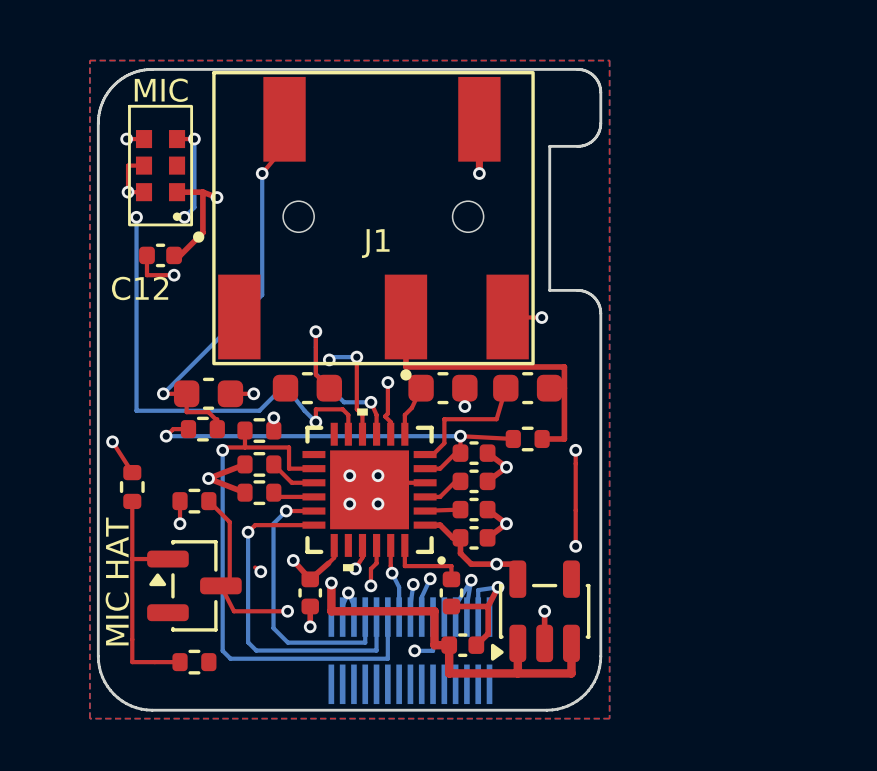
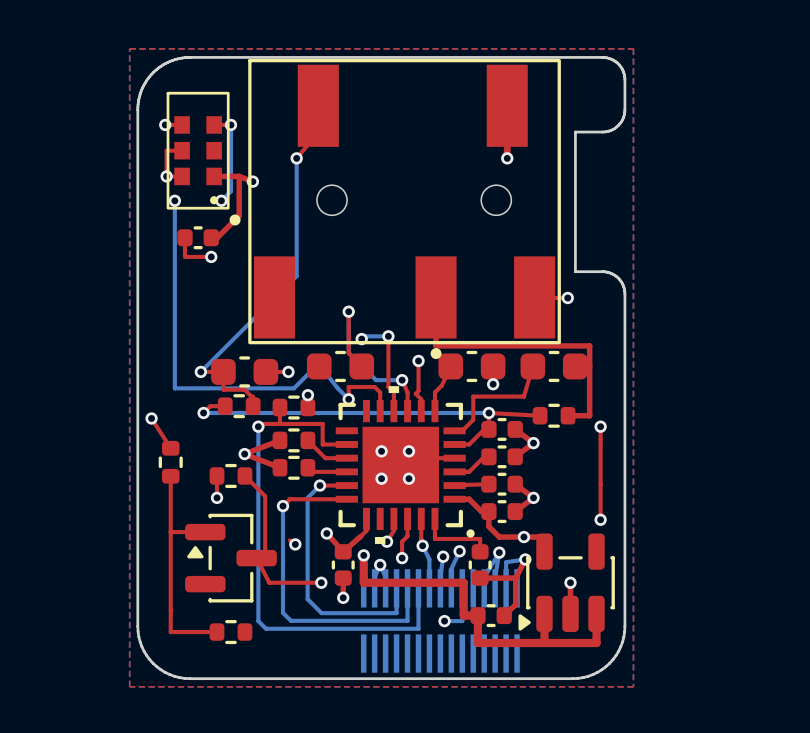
text: MIC (161, 90) -> none
text: J1 (375, 243) -> none
text: C12 (140, 288) -> none
text: MIC HAT (117, 581) -> none

